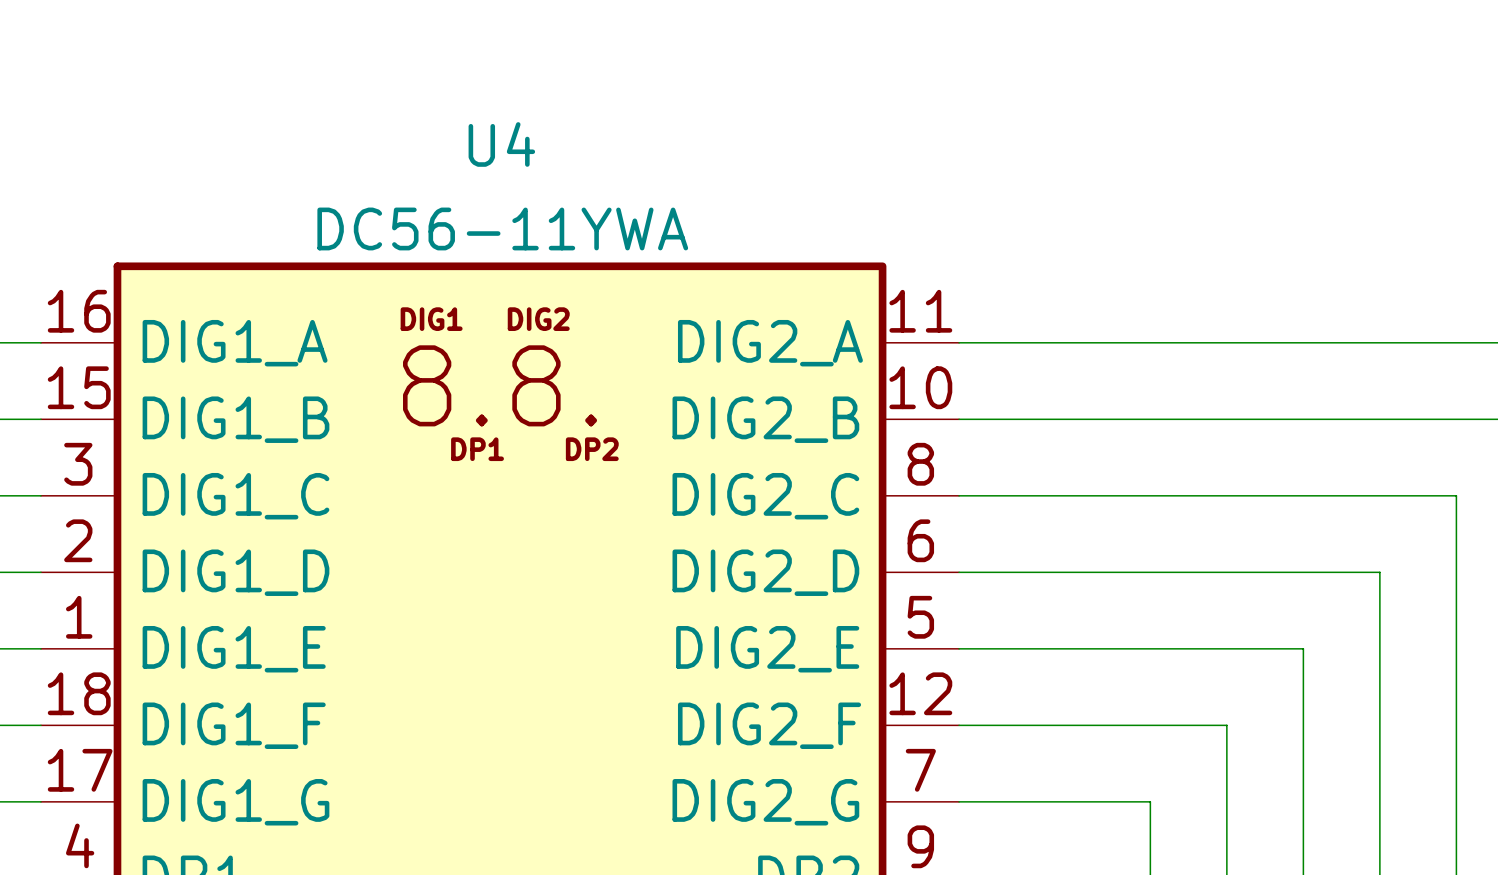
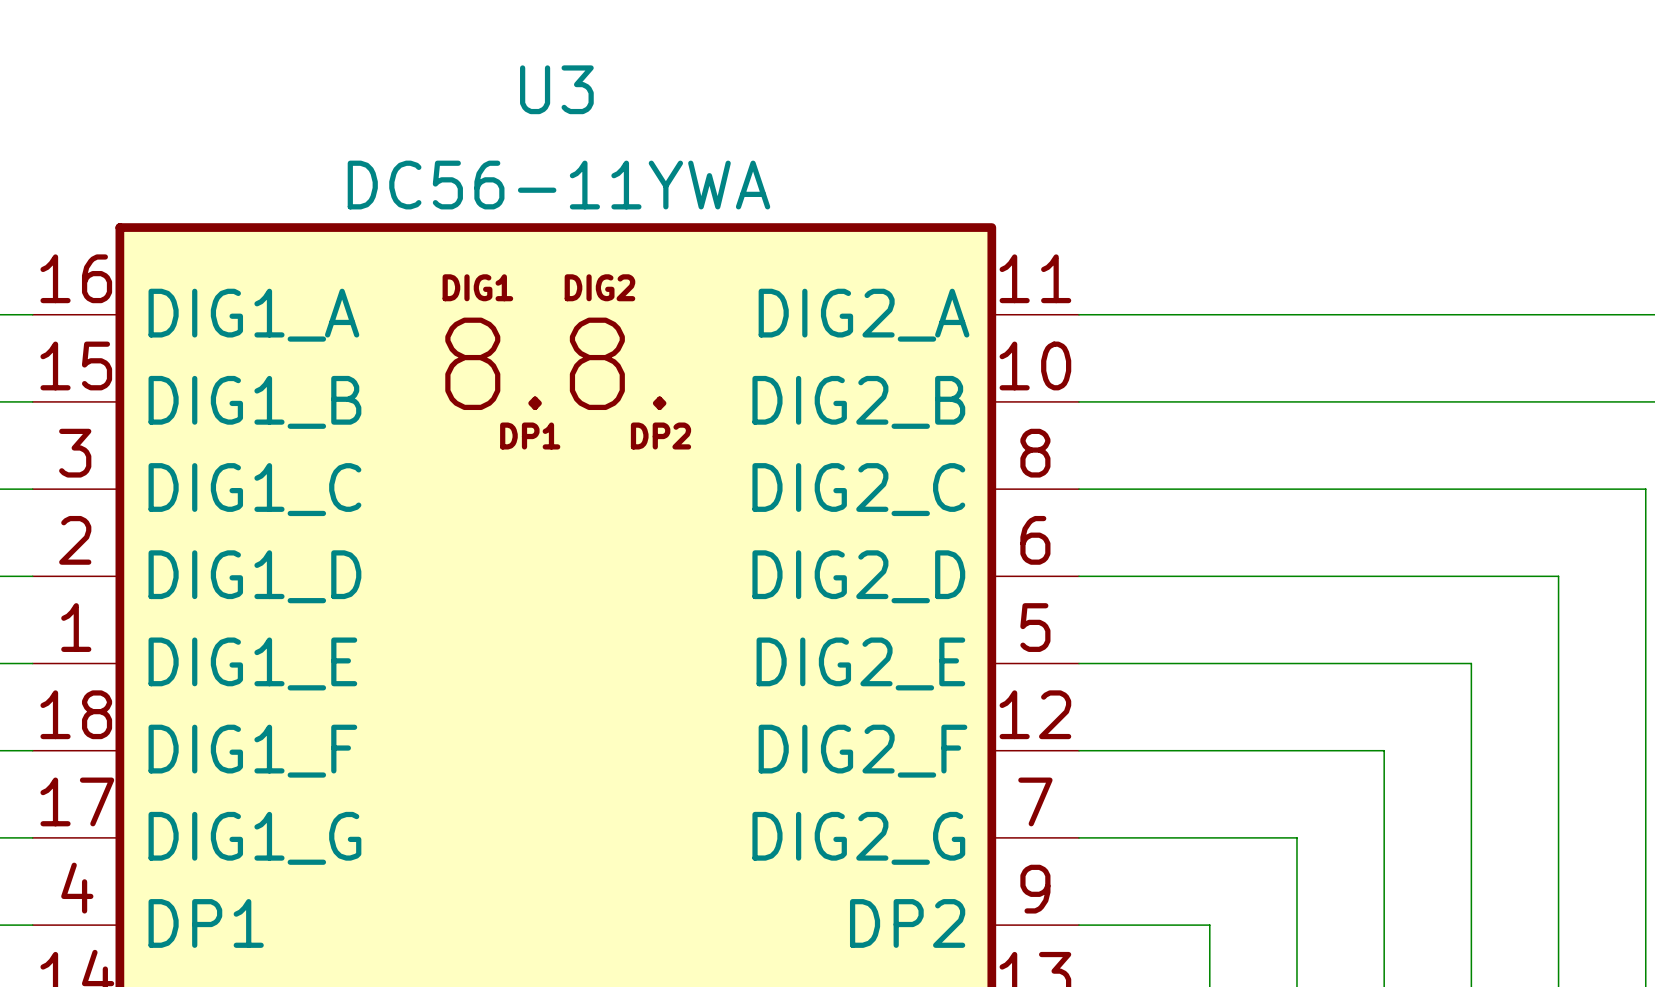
U4 name: U4 (501, 144) -> U3 (556, 89)

